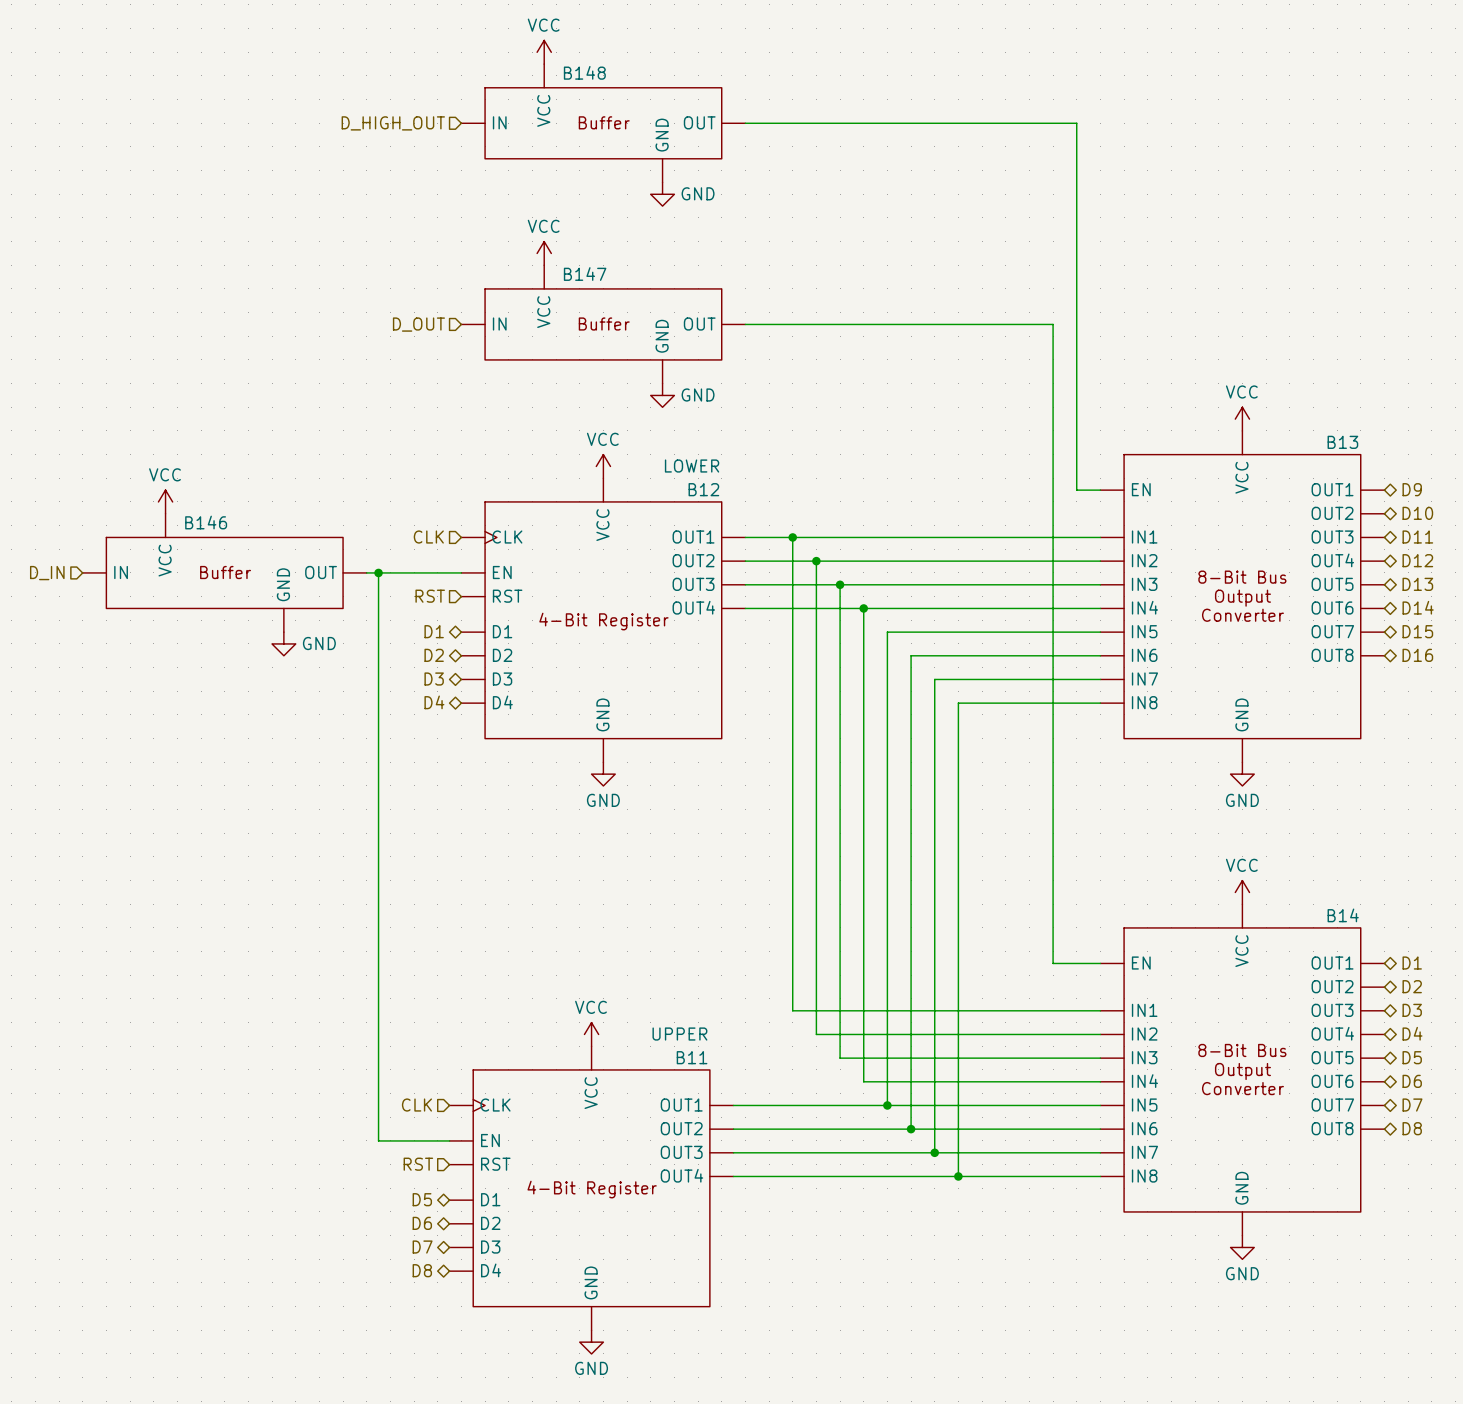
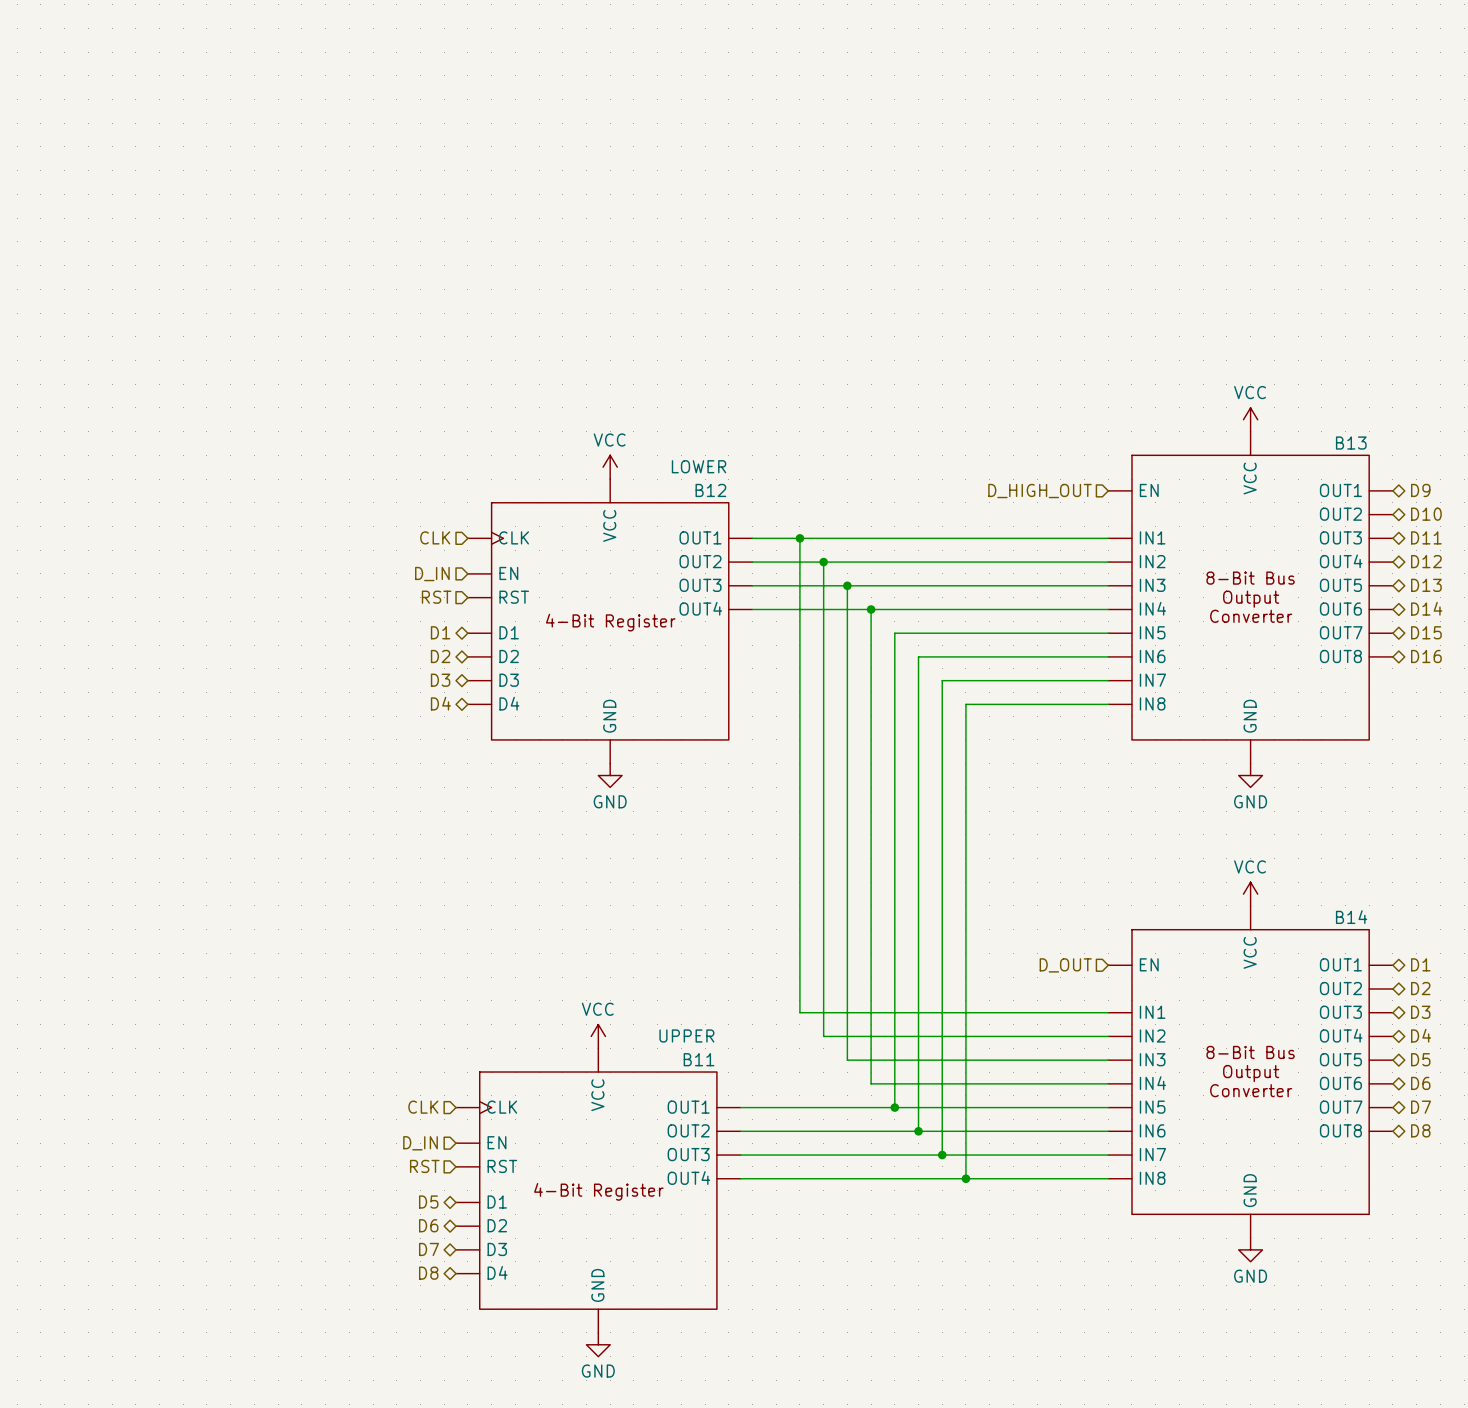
power symbol: VCC (544, 52) -> none
hierarchical label: D_HIGH_OUT (393, 123) -> none
B148: (603, 123) -> none
wire: (745, 123) (1076, 123) (1076, 490) (1100, 490) -> none
power symbol: GND (662, 194) -> none
power symbol: VCC (544, 253) -> none
hierarchical label: D_OUT (418, 324) -> none
B147: (603, 324) -> none
wire: (745, 324) (1053, 324) (1053, 963) (1100, 963) -> none
power symbol: GND (662, 395) -> none
hierarchical label: none -> D_HIGH_OUT (1040, 491)
power symbol: VCC (165, 501) -> none
B146: (224, 572) -> none
wire: (366, 572) (461, 572) -> none
wire: (378, 572) (378, 1140) (449, 1140) -> none
junction: (378, 572) -> none
hierarchical label: D_IN (47, 573) -> none
hierarchical label: none -> D_IN (432, 574)
power symbol: GND (283, 643) -> none
hierarchical label: none -> D_OUT (1065, 965)
hierarchical label: none -> D_IN (420, 1143)

